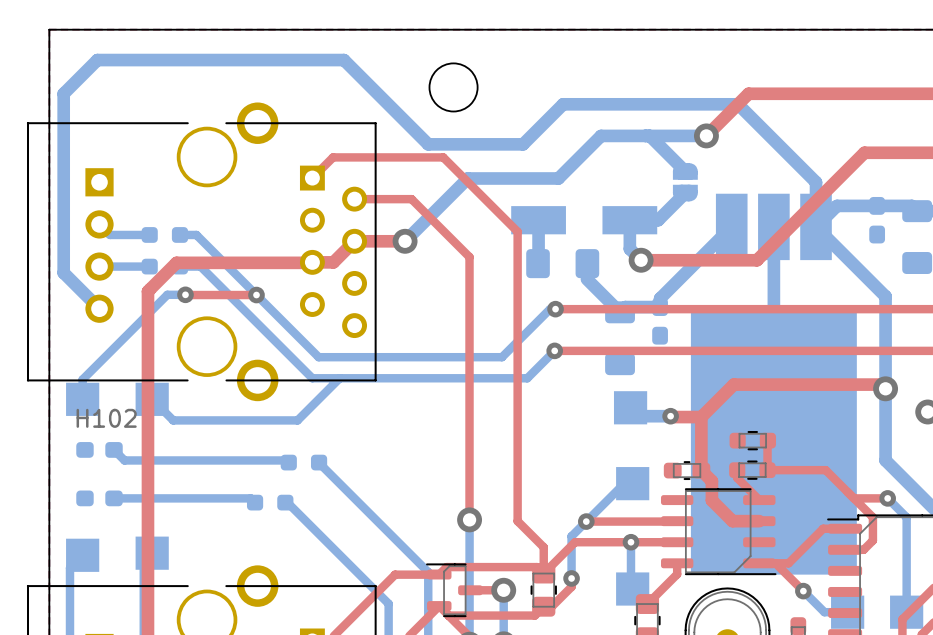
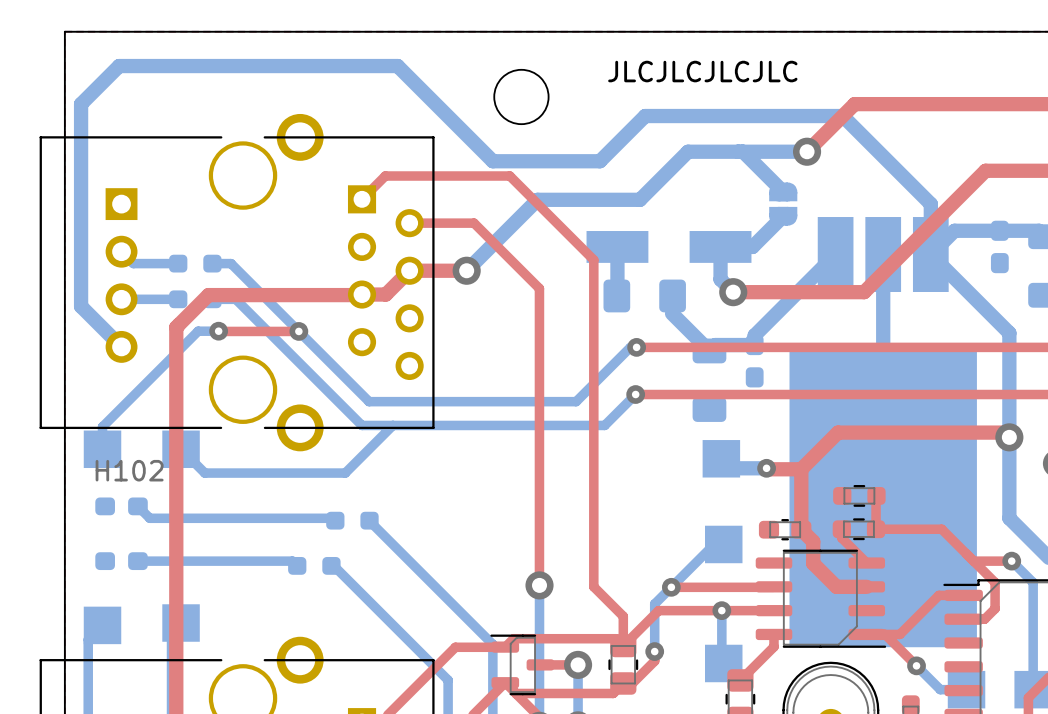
text: none -> JLCJLCJLCJLC (702, 71)

